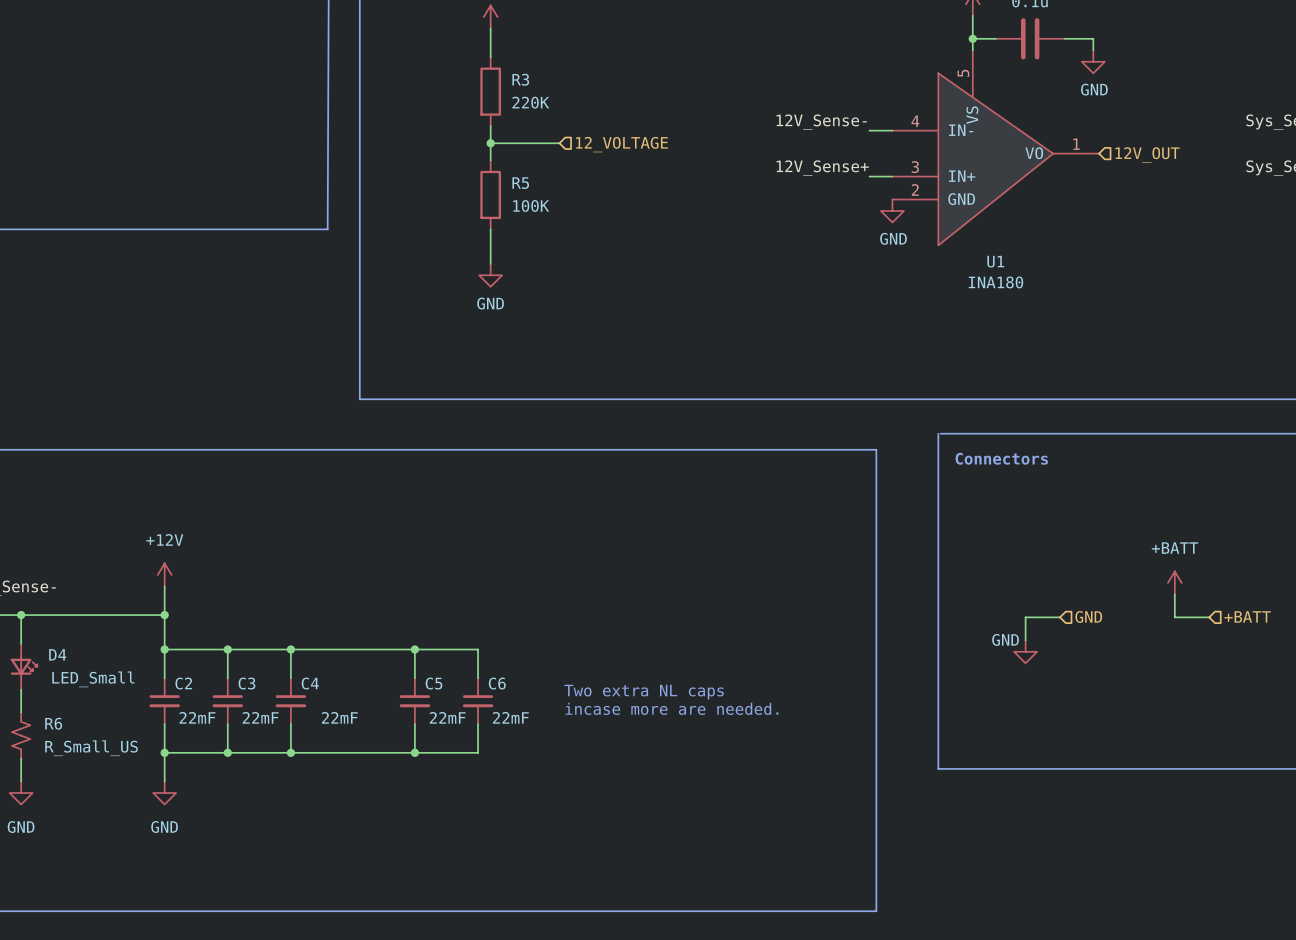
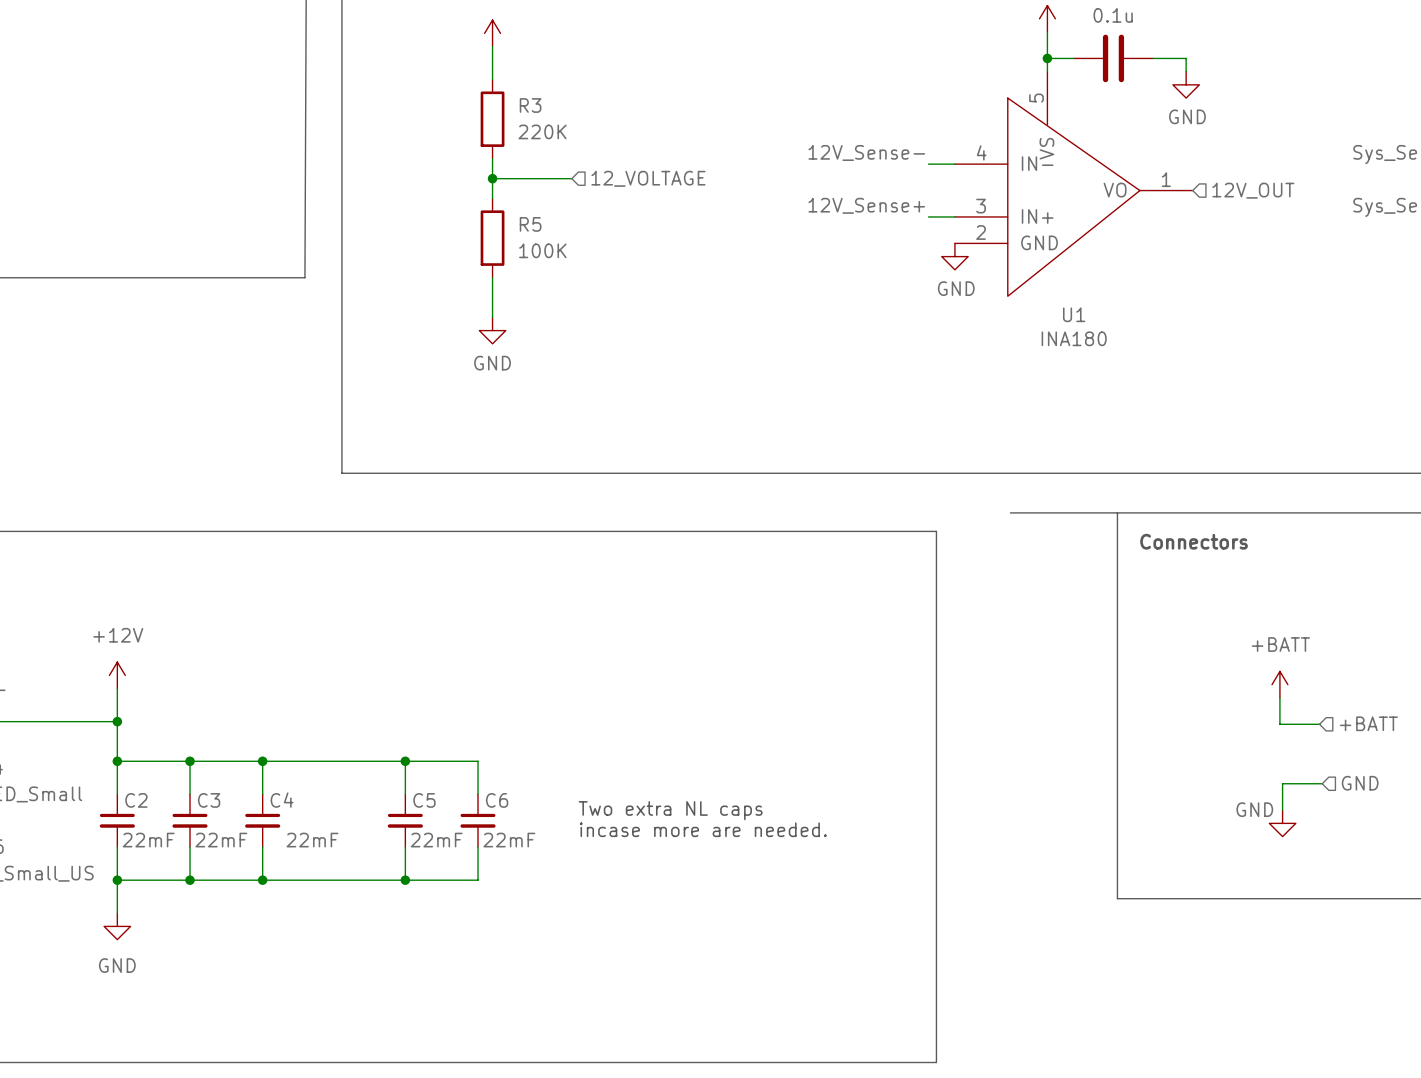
line: (938, 433) (938, 768) (1033, 768) -> (1117, 512) (1117, 898)
text position: Connectors (1001, 458) -> Connectors (1194, 541)
hierarchical label position: GND (1088, 616) -> GND (1360, 783)
wire: (1060, 617) (1025, 617) (1025, 640) -> (1322, 783) (1282, 783) (1282, 810)
power symbol position: GND (1025, 651) -> GND (1282, 823)

